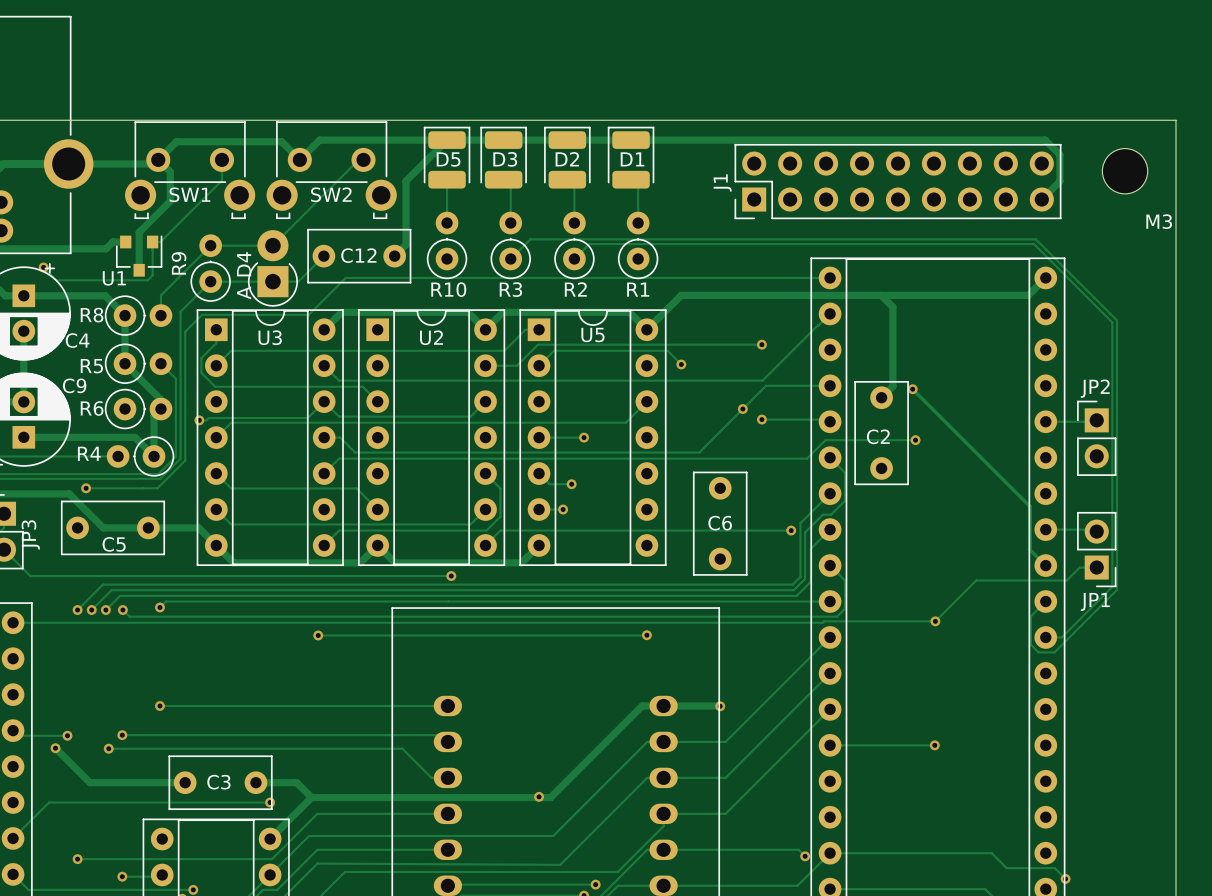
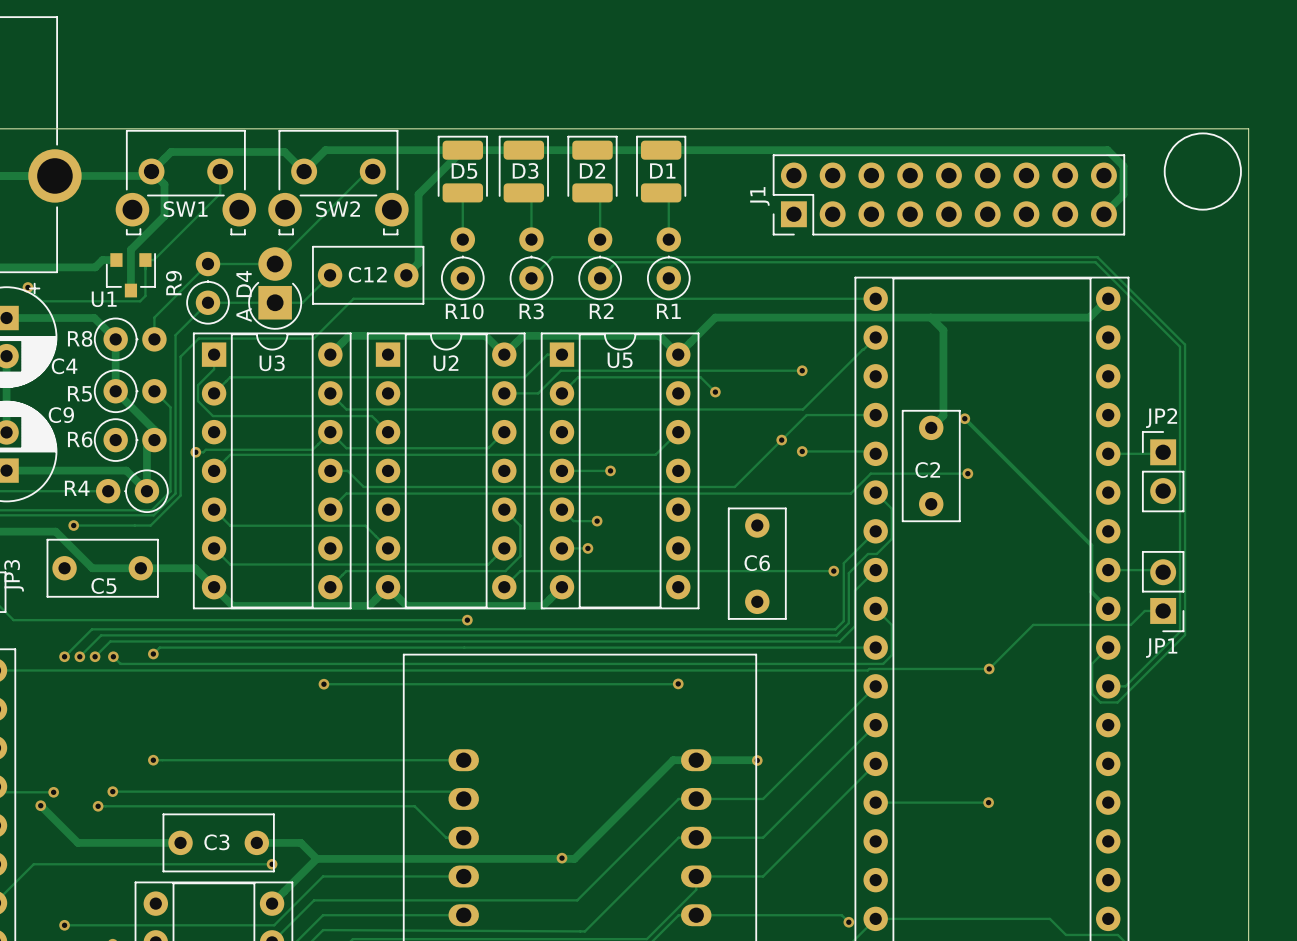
drawing: none -> [1163, 132, 1242, 211]
M3: (1125, 171) -> none

